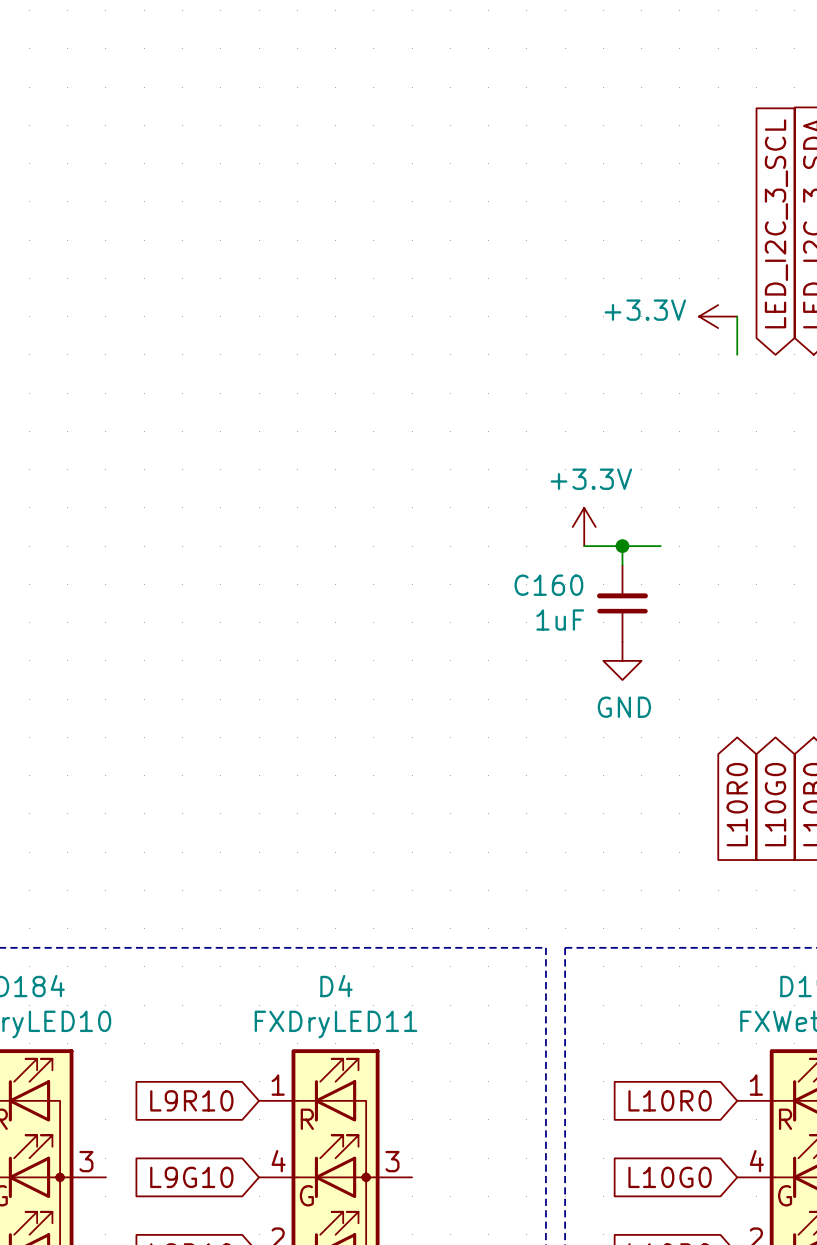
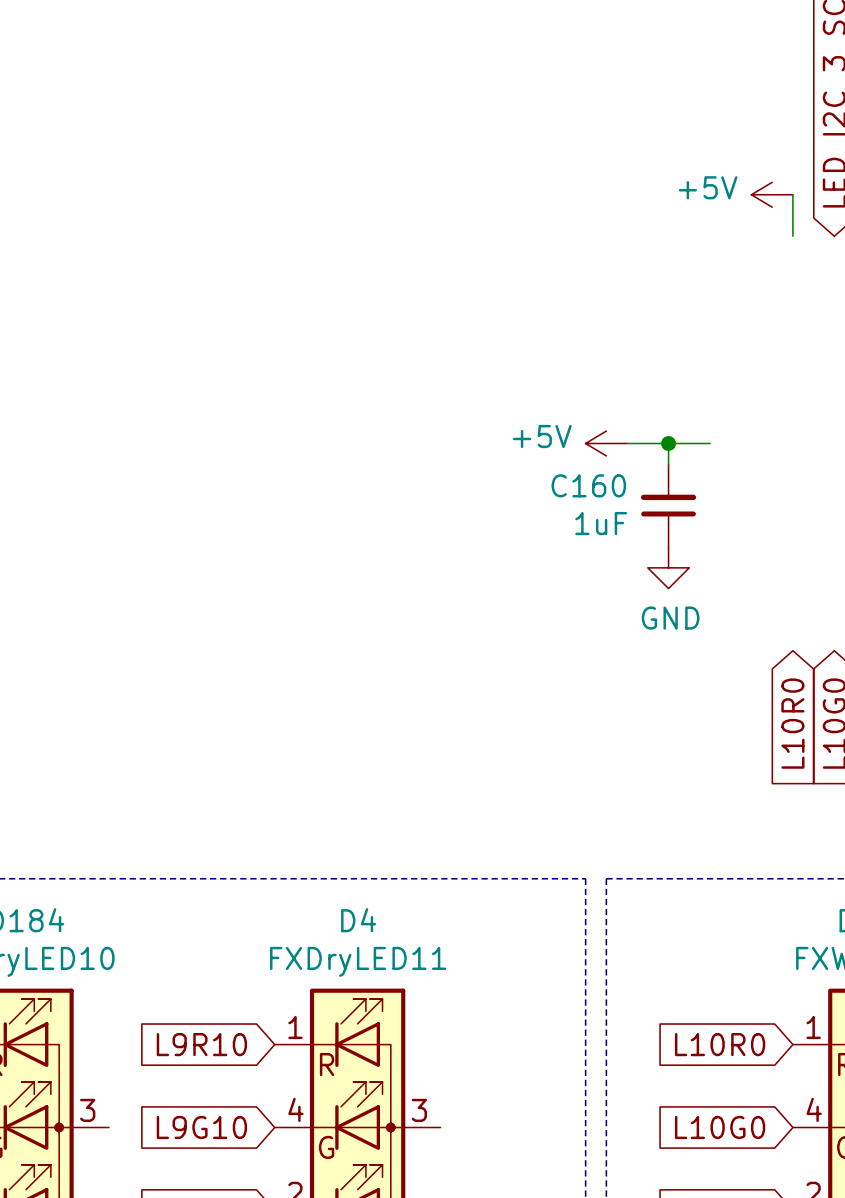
power symbol: +3.3V (718, 316) -> +5V (772, 194)
power symbol: +3.3V (584, 526) -> none
power symbol: none -> +5V (606, 443)

